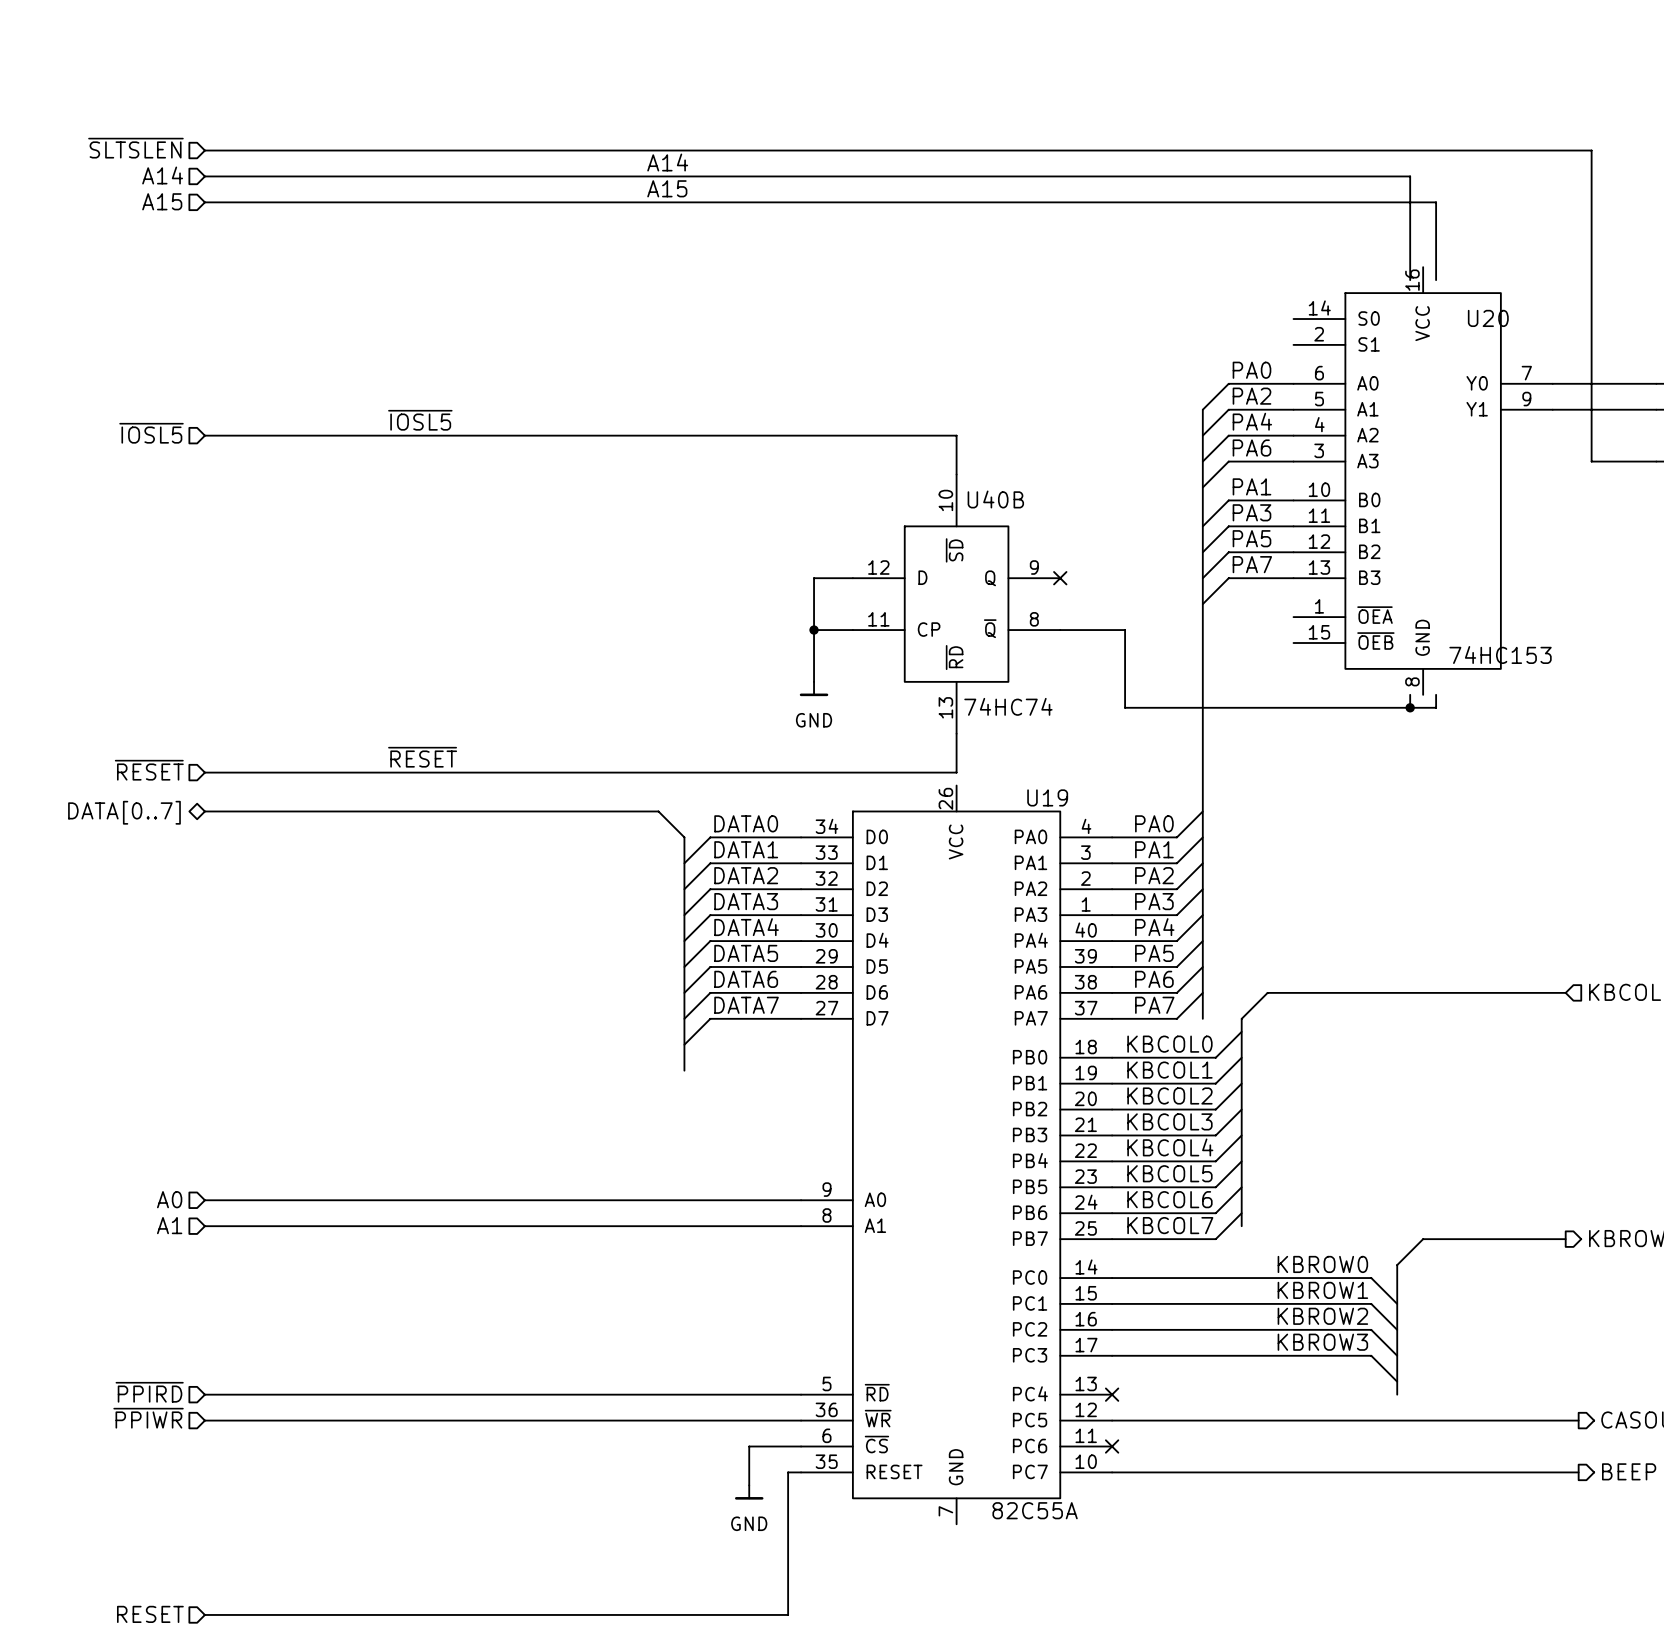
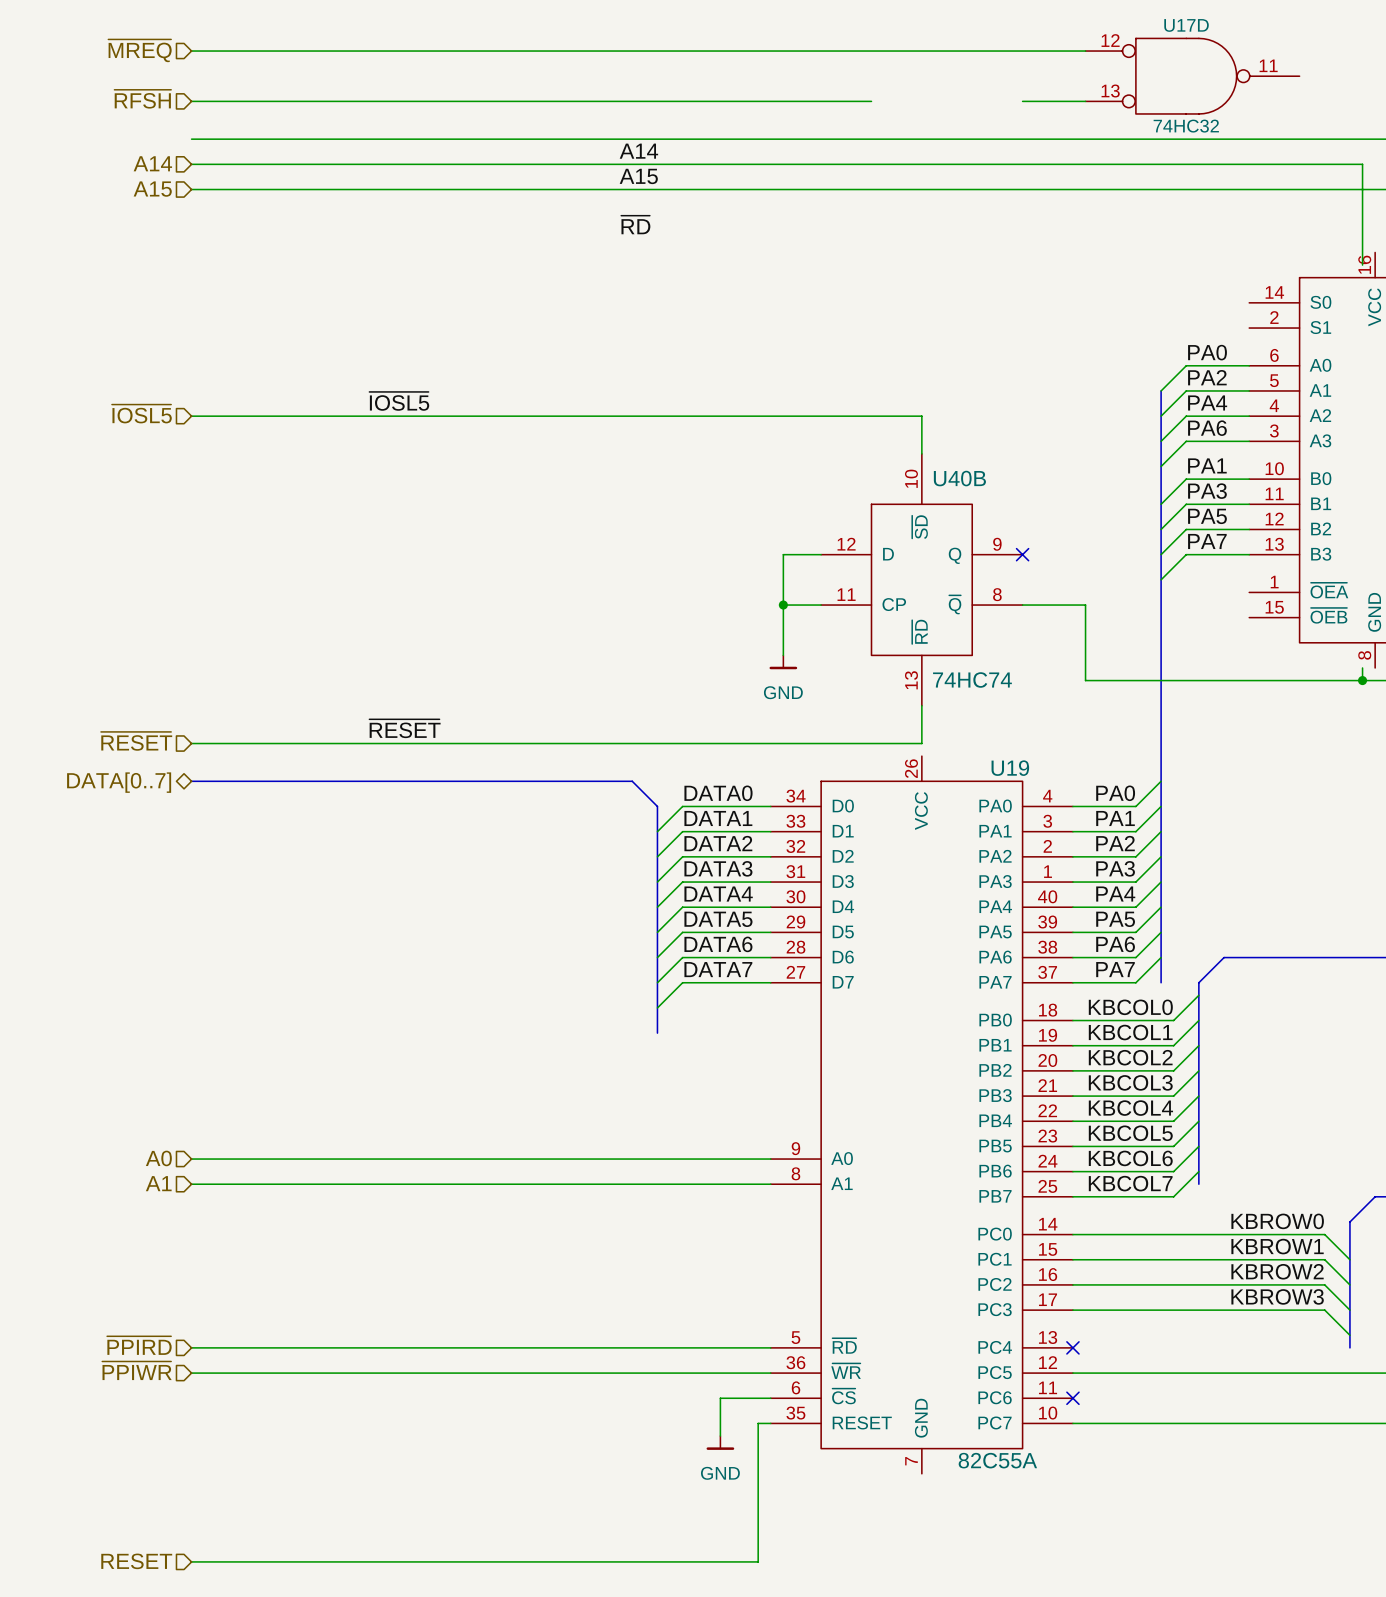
hierarchical label: none -> ~{MREQ} (139, 50)
wire: none -> (191, 51) (1085, 51)
U17D: none -> 74HC32 (1192, 76)
hierarchical label: none -> ~{RFSH} (142, 99)
wire: none -> (191, 101) (871, 101)
wire: none -> (1022, 101) (1085, 101)
hierarchical label: ~{SLTSLEN} (135, 148) -> none
label: none -> ~{RD} (635, 224)

